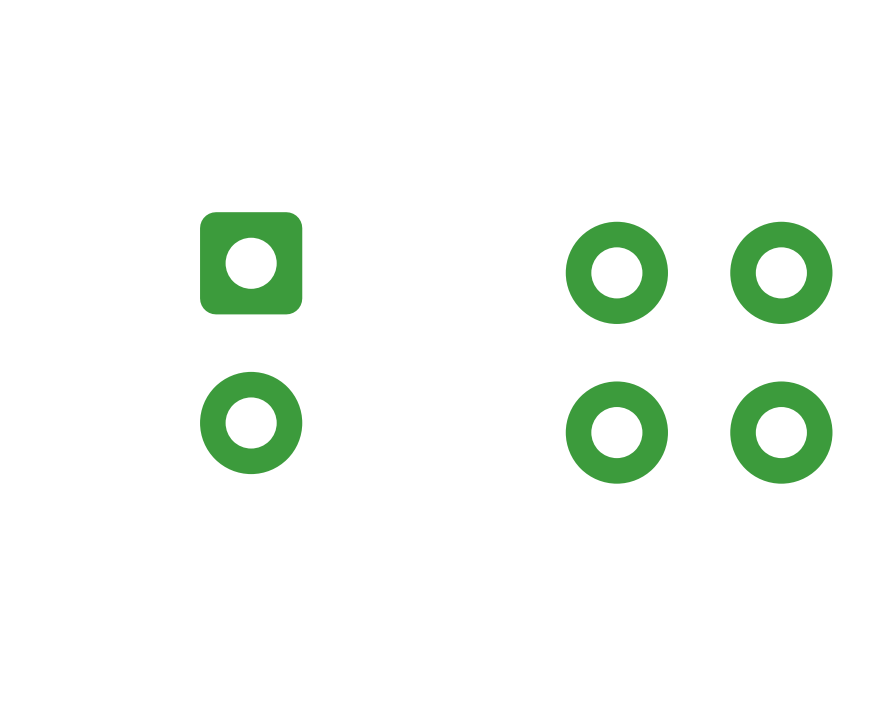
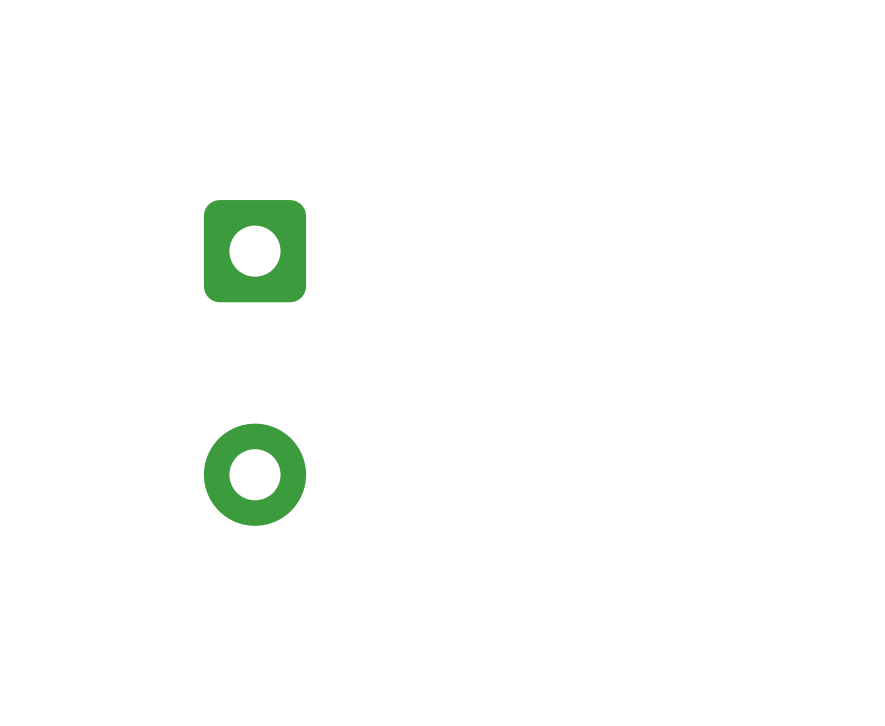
part footprint: [200, 212, 303, 475] -> [203, 200, 307, 526]
part: (616, 352) -> none
part: (781, 352) -> none

